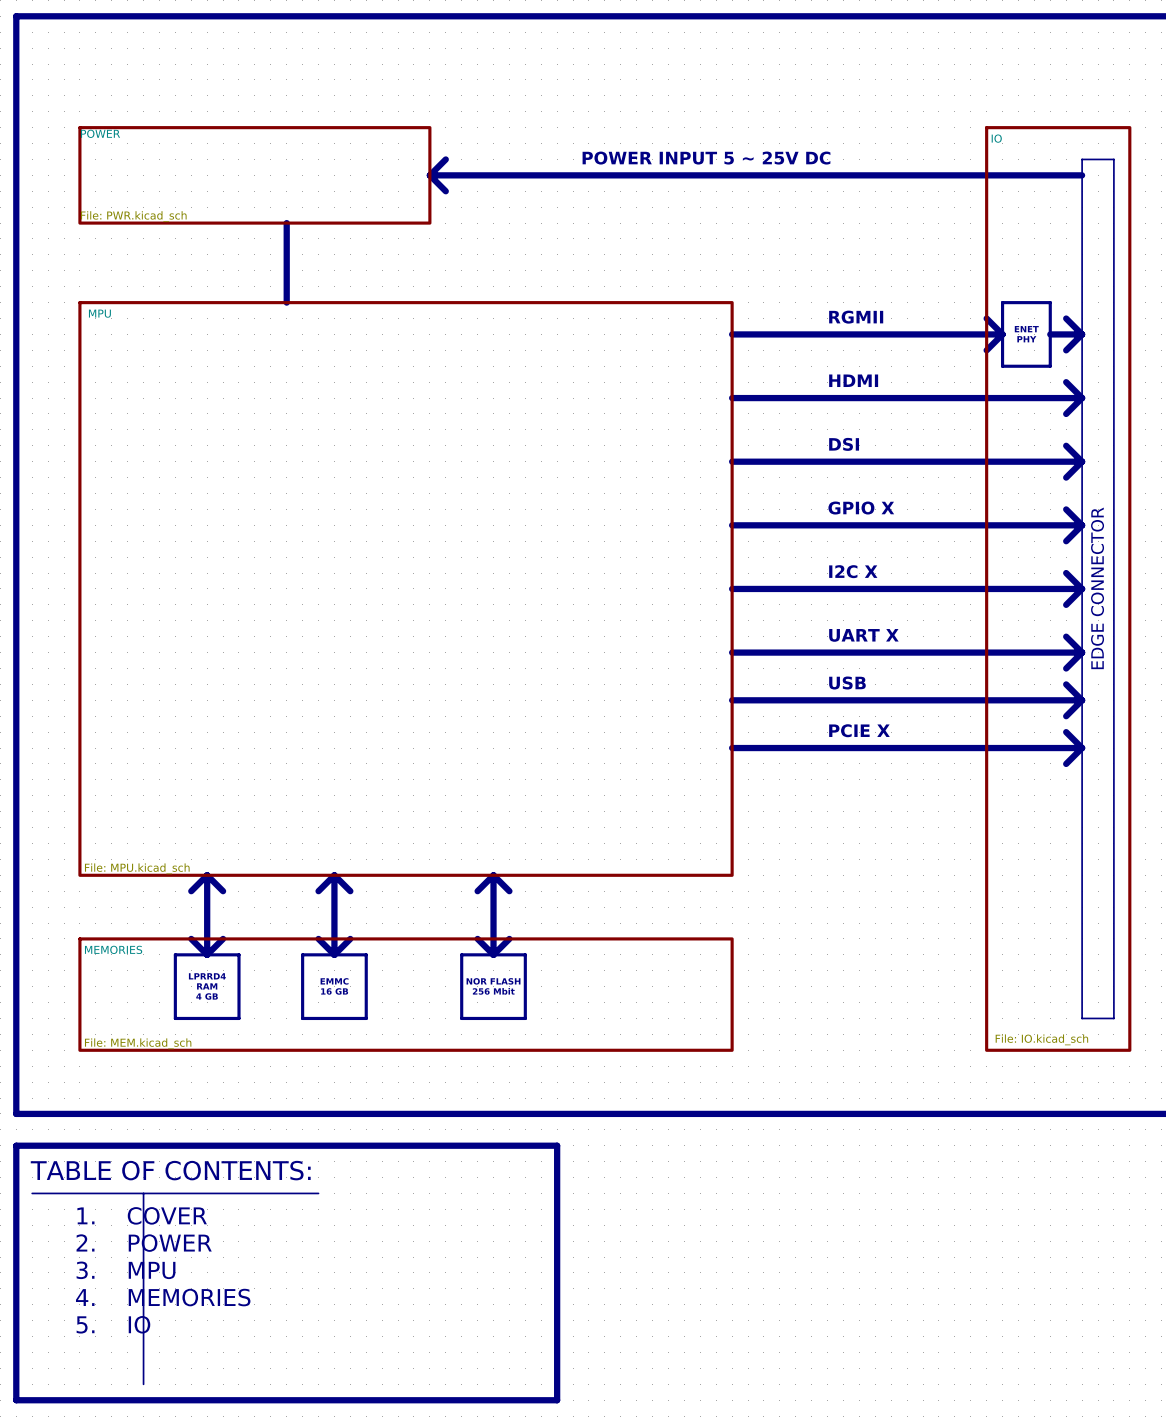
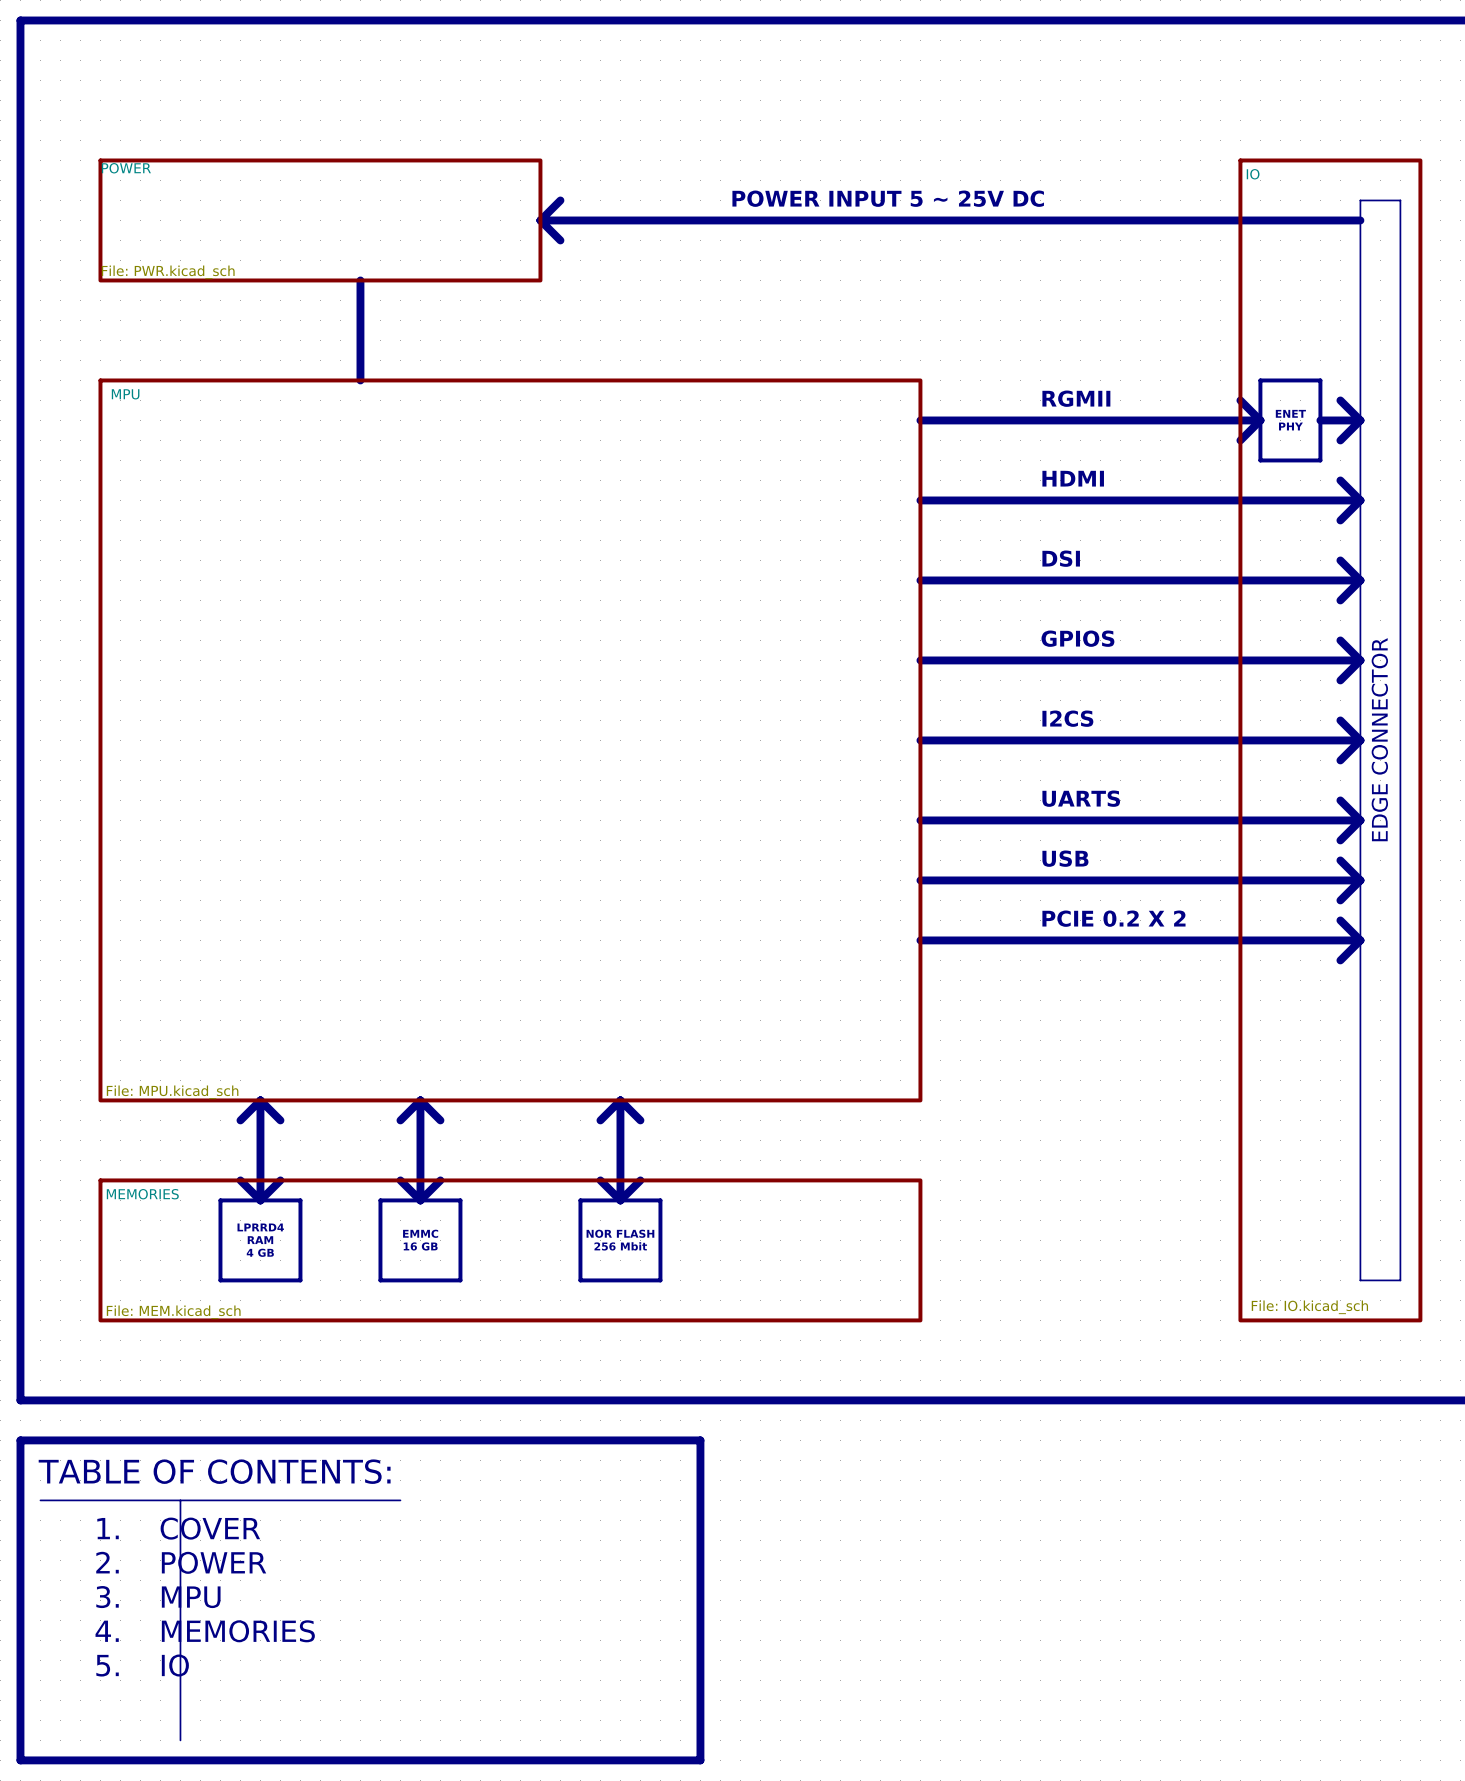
text: GPIO X (861, 508) -> GPIOS (1077, 638)
text: I2C X (853, 571) -> I2CS (1067, 718)
text: UART X (863, 635) -> UARTS (1081, 798)
text: PCIE X (859, 730) -> PCIE 0.2 X 2 (1113, 918)

